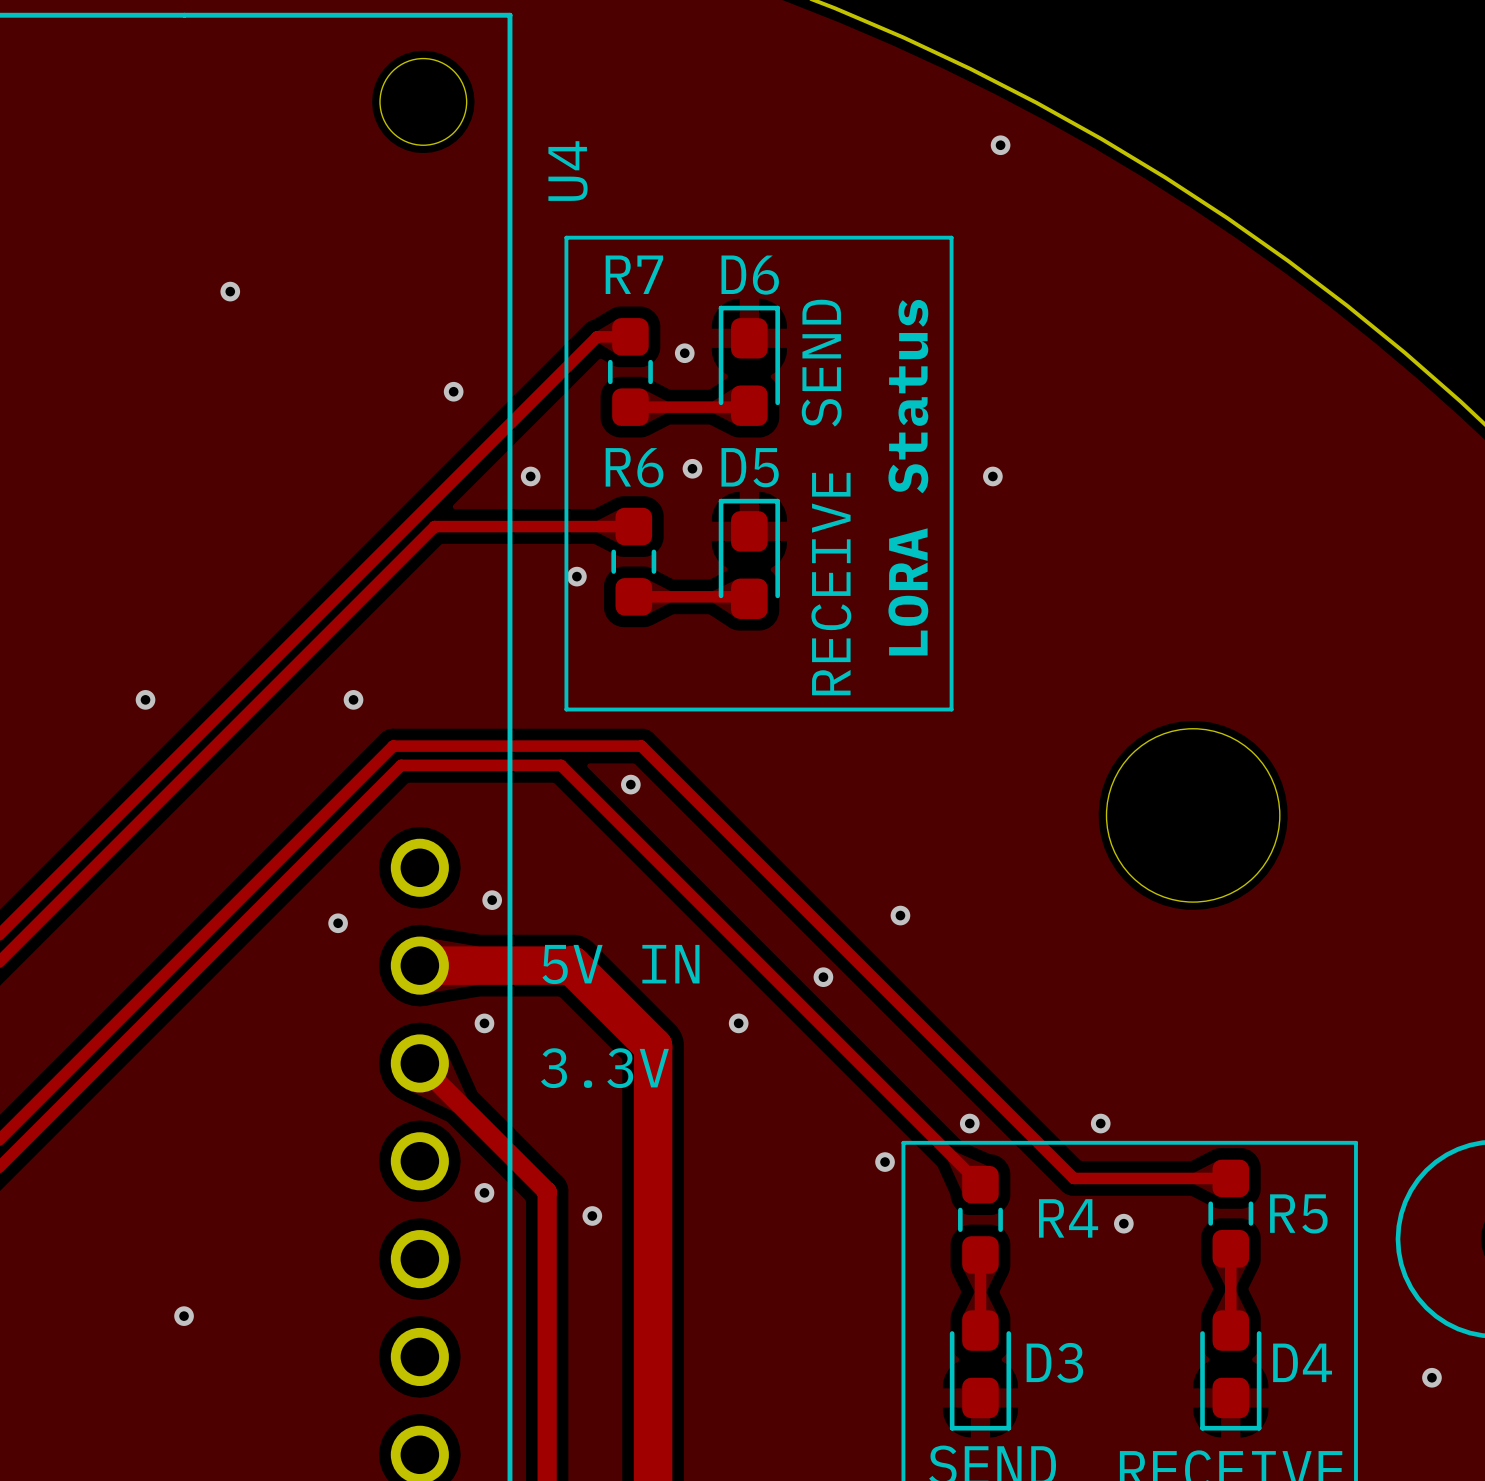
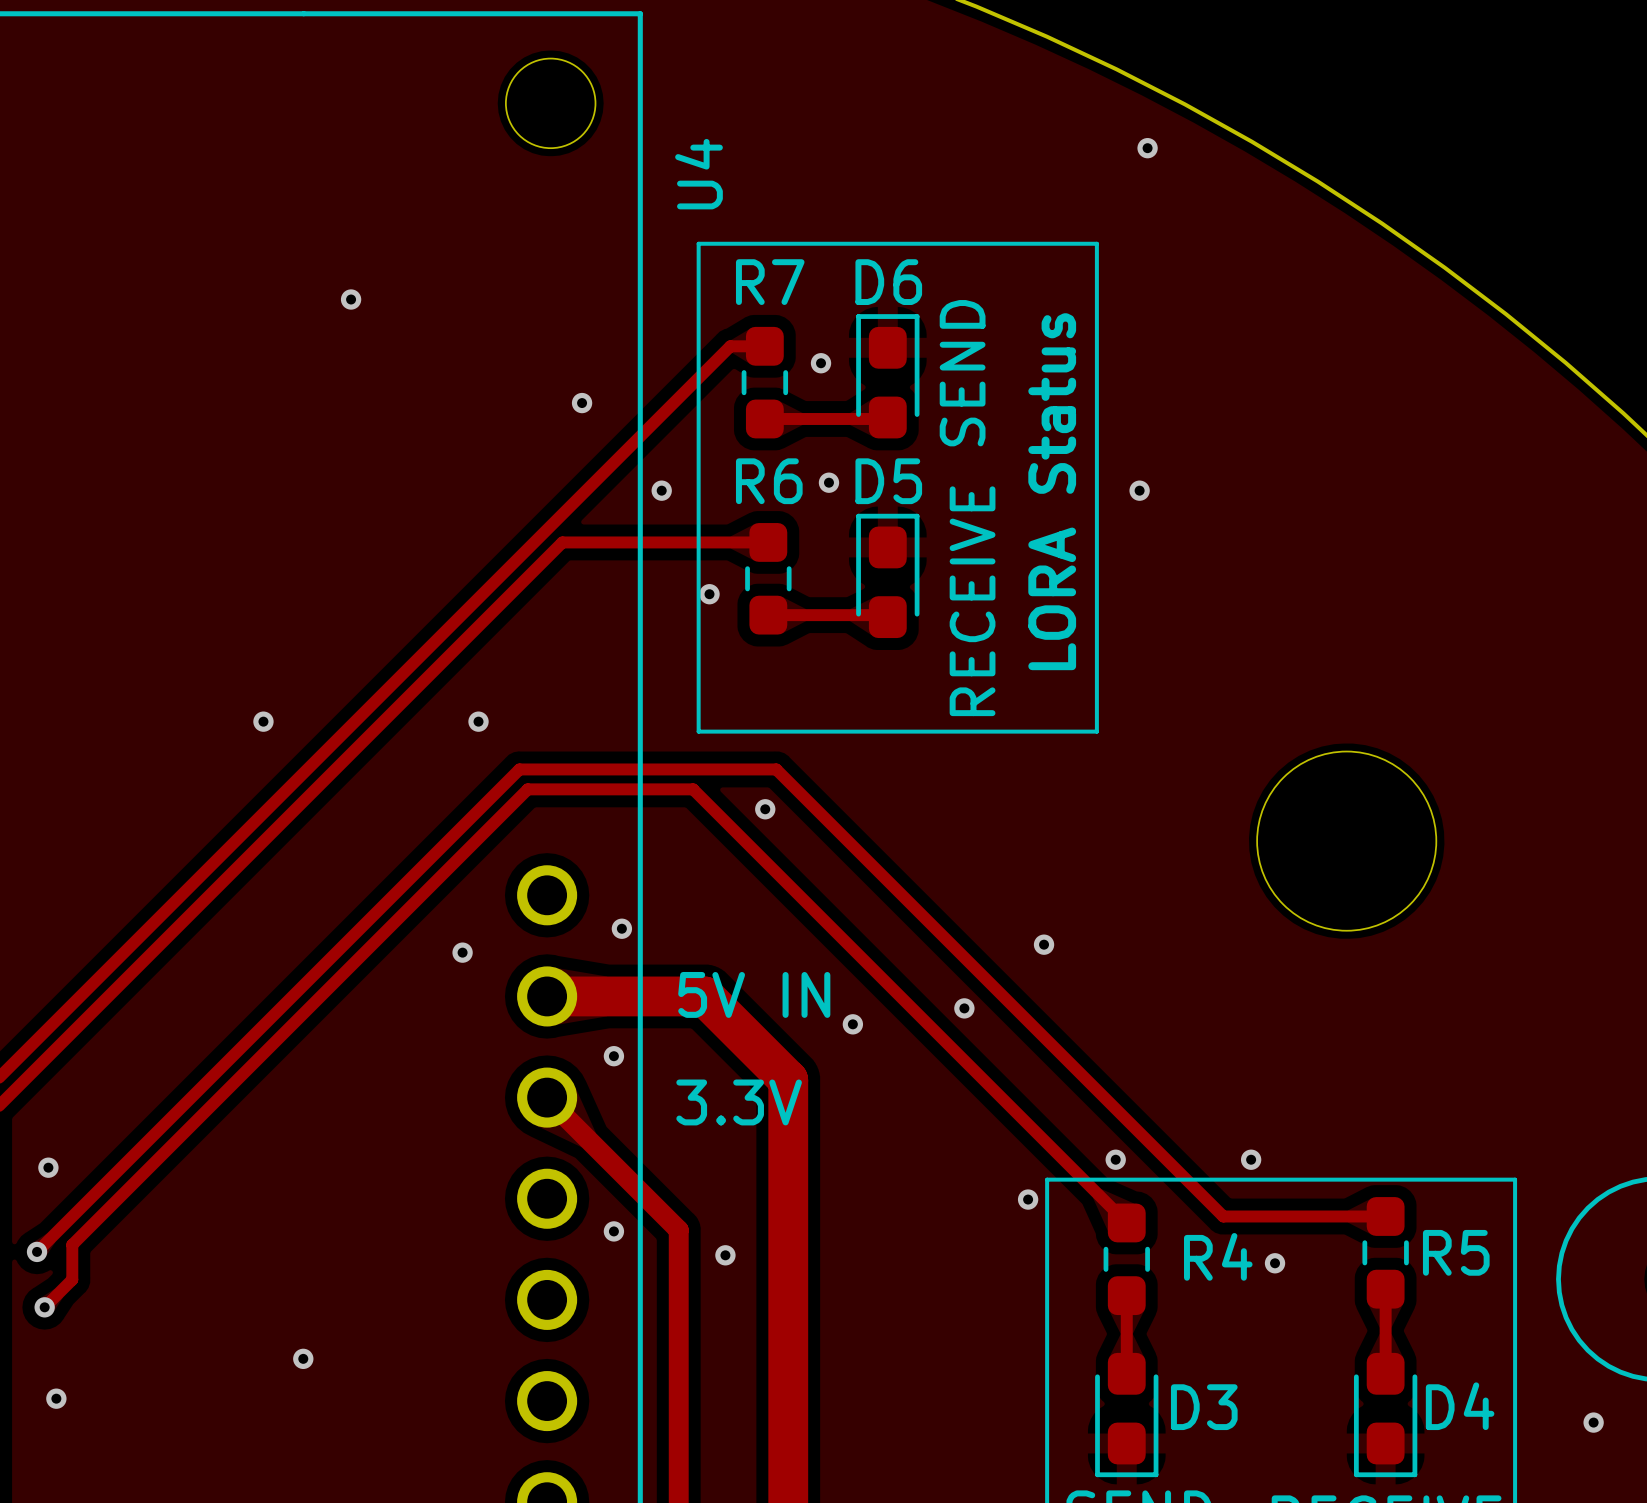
via position: (738, 1023) -> (852, 1024)

